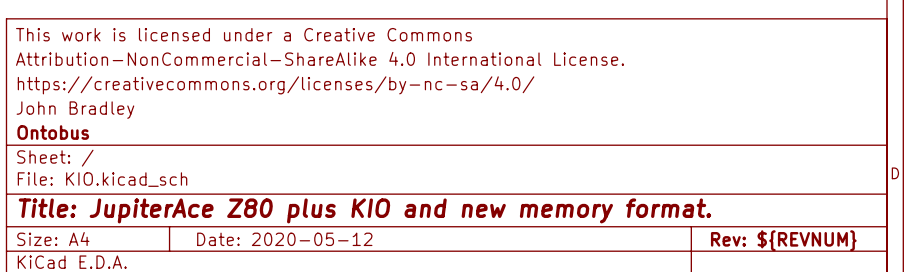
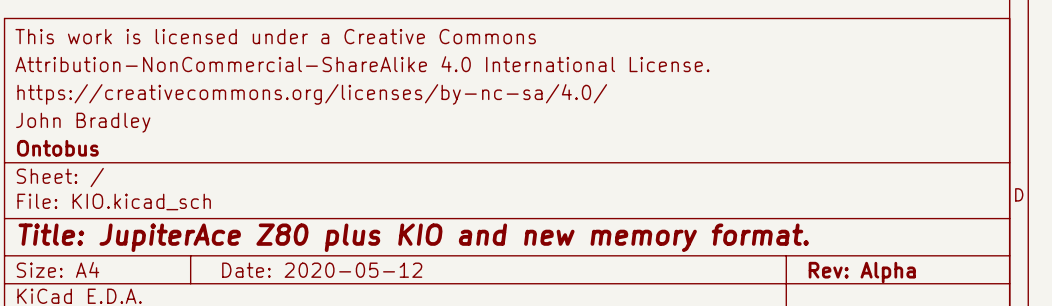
title block: Rev: ${REVNUM} (783, 240) -> Rev: Alpha (862, 272)

